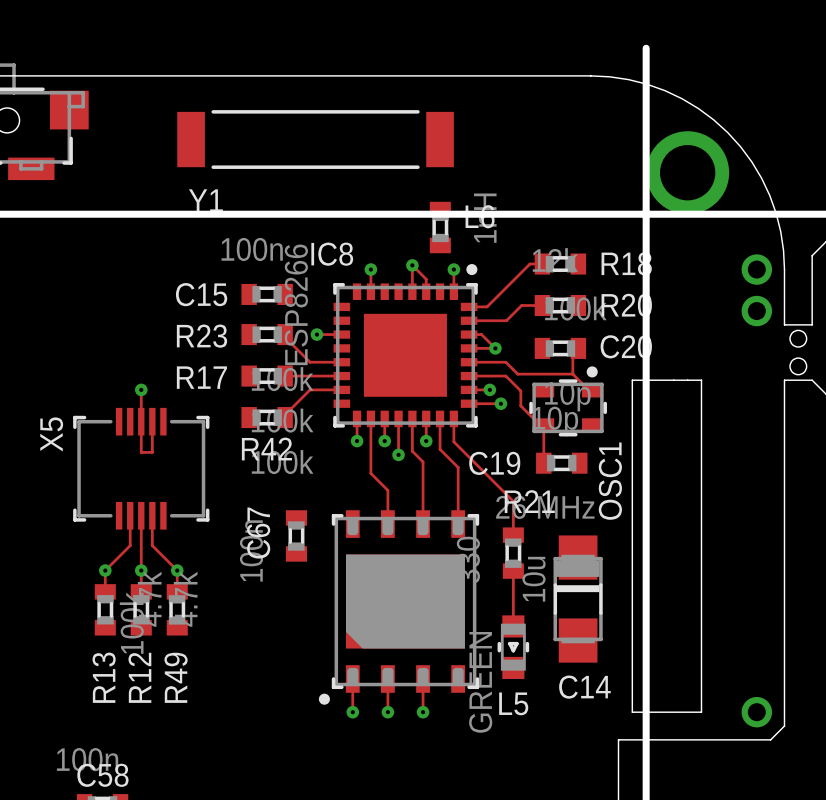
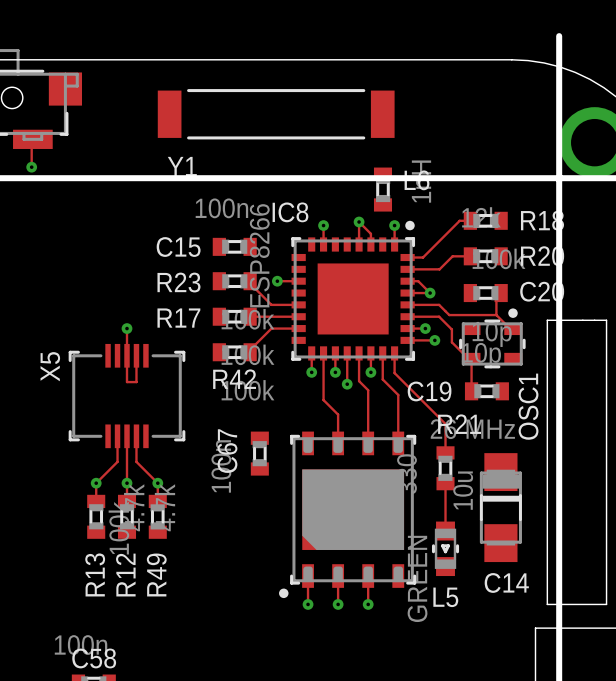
top track: none -> (31, 141) (31, 167)
via: none -> (31, 167)

